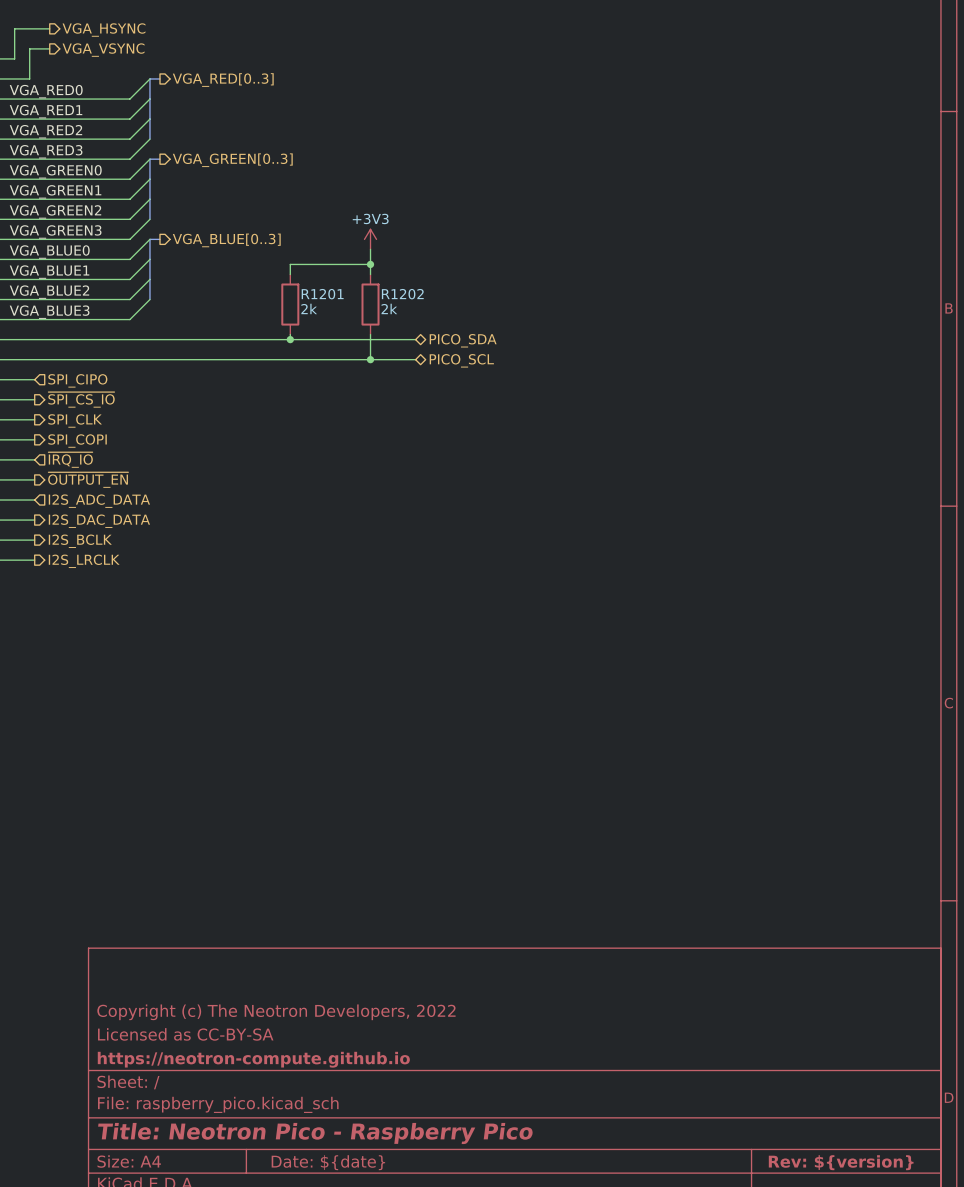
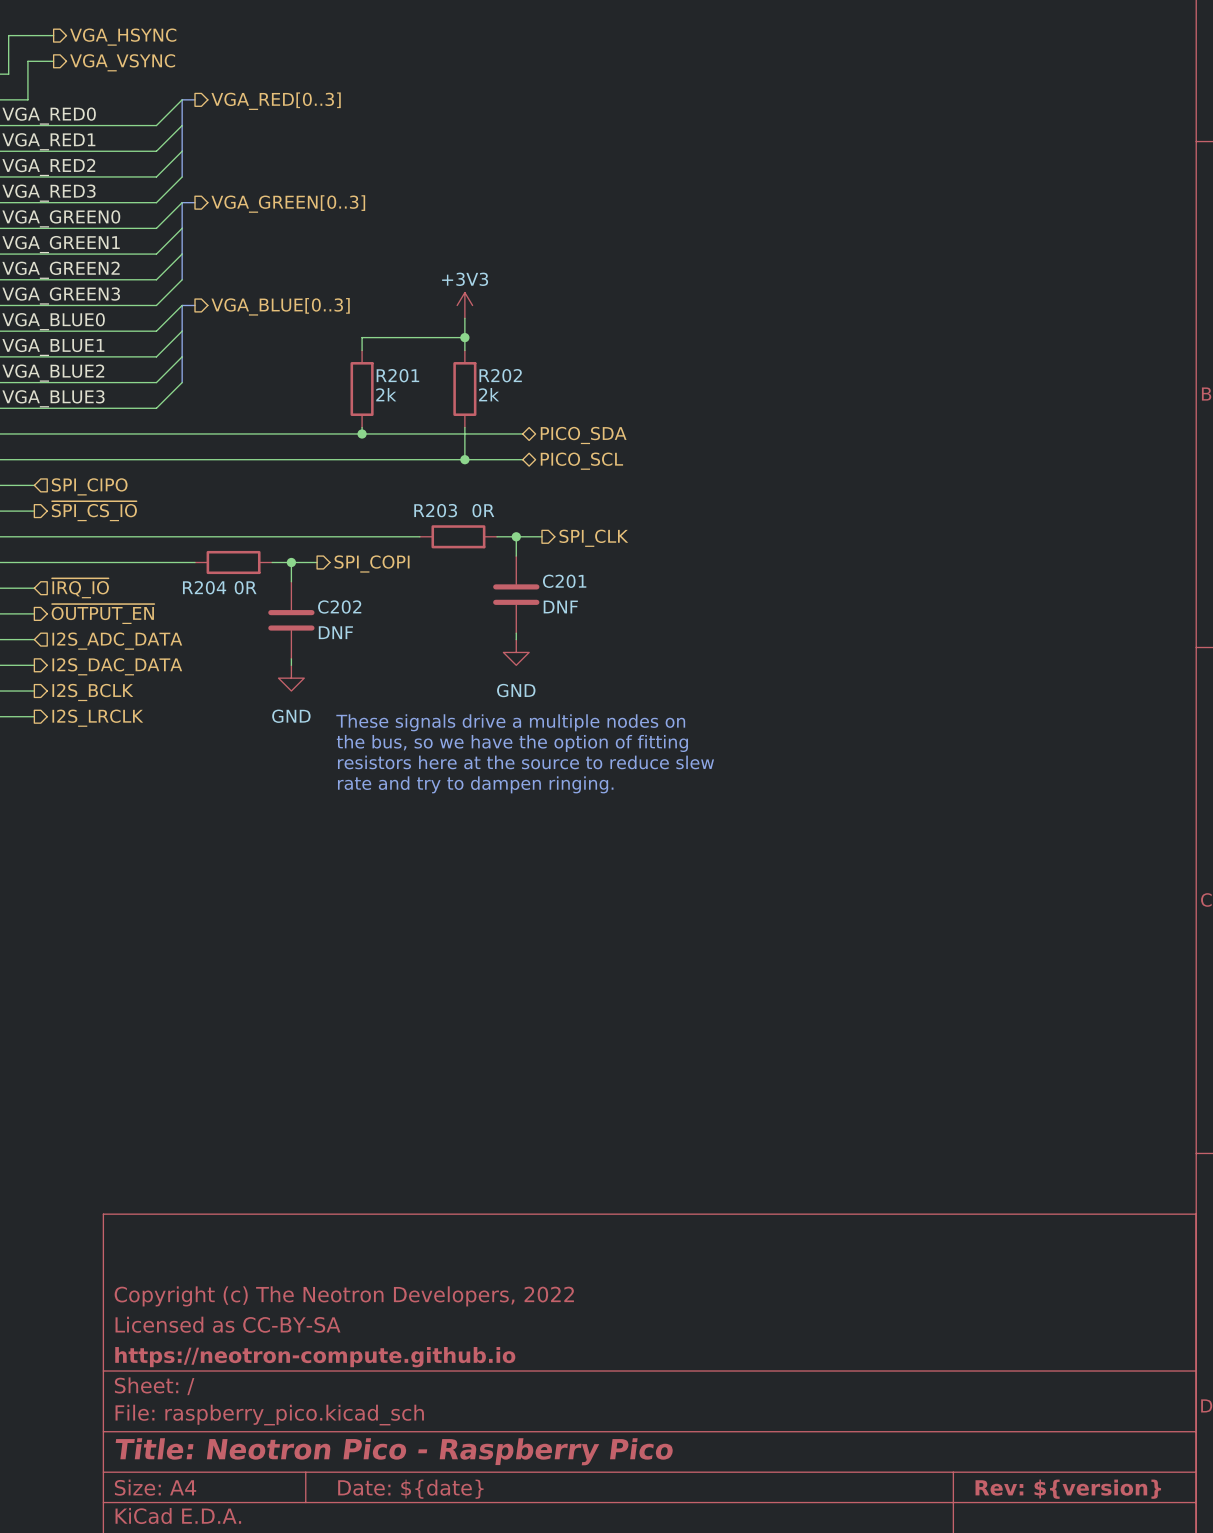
R1201 name: R1201 (322, 294) -> R201 (397, 375)
R1202 name: R1202 (402, 294) -> R202 (500, 375)
wire: none -> (34, 536) (419, 536)
R203: none -> 0R (458, 536)
wire: none -> (497, 536) (541, 536)
wire: none -> (516, 536) (516, 556)
junction: none -> (516, 536)
hierarchical label: SPI_CLK (75, 420) -> none
hierarchical label: none -> SPI_CLK (593, 538)
wire: none -> (34, 562) (195, 562)
R204: none -> 0R (233, 562)
wire: none -> (272, 562) (317, 562)
wire: none -> (291, 562) (291, 581)
junction: none -> (291, 562)
hierarchical label: SPI_COPI (77, 441) -> none
hierarchical label: none -> SPI_COPI (372, 563)
C201: none -> DNF (516, 594)
C202: none -> DNF (291, 620)
wire: none -> (516, 633) (516, 639)
power symbol: none -> GND (516, 652)
wire: none -> (291, 658) (291, 665)
power symbol: none -> GND (291, 678)
text: none -> These signals drive a multiple nodes on (510, 722)
text: none -> the bus, so we have the option of fitting (512, 743)
text: none -> resistors here at the source to reduce slew (526, 762)
text: none -> rate and try to dampen ringing. (475, 784)

